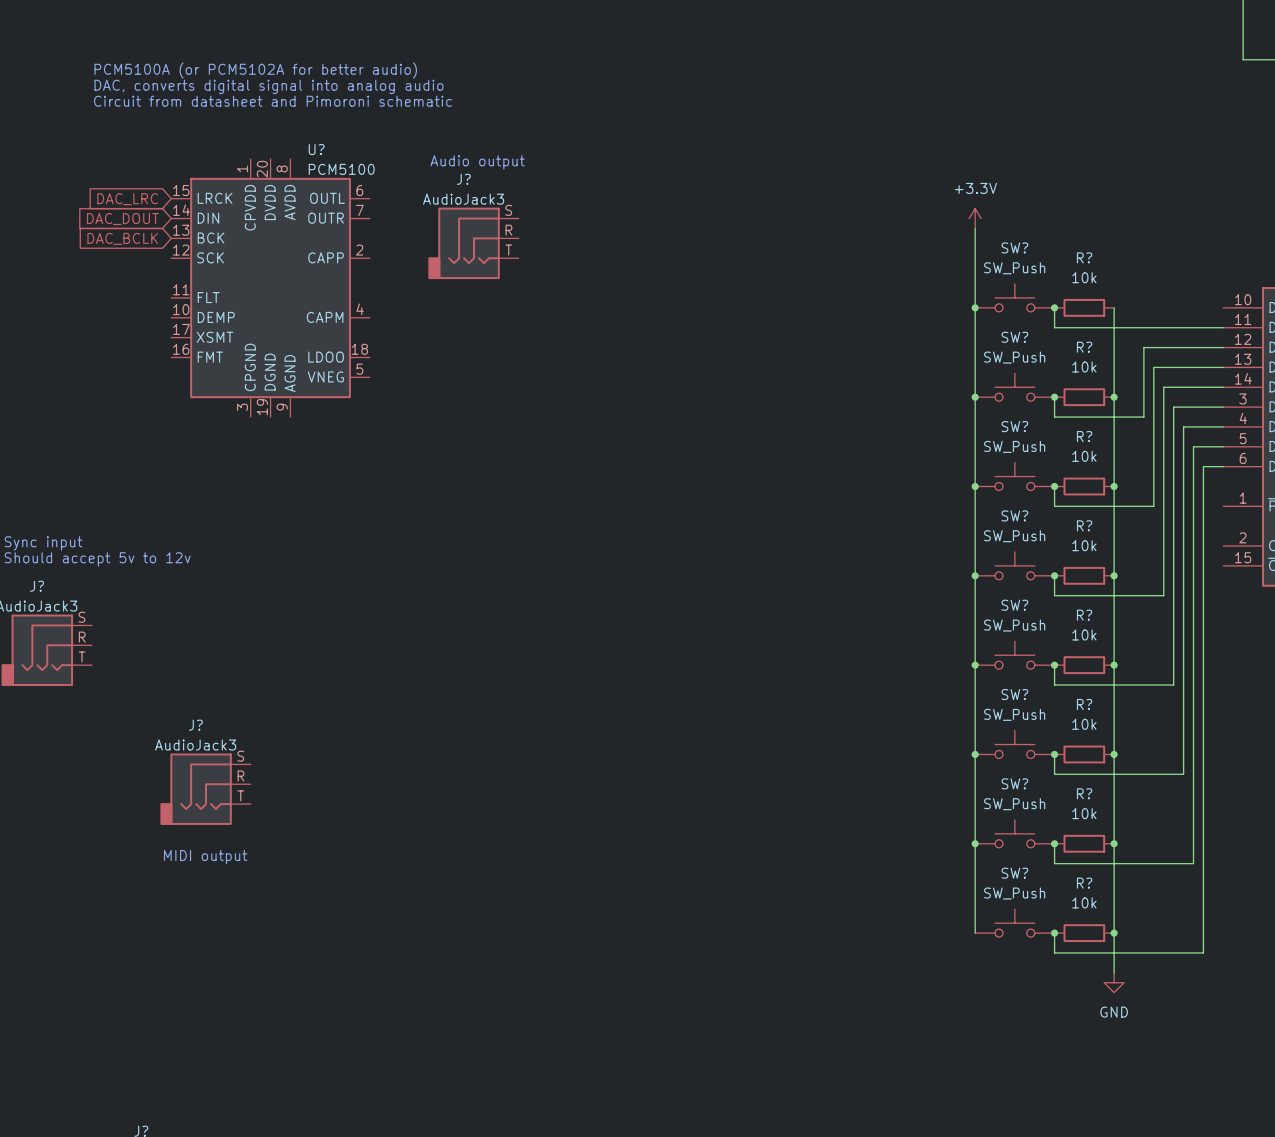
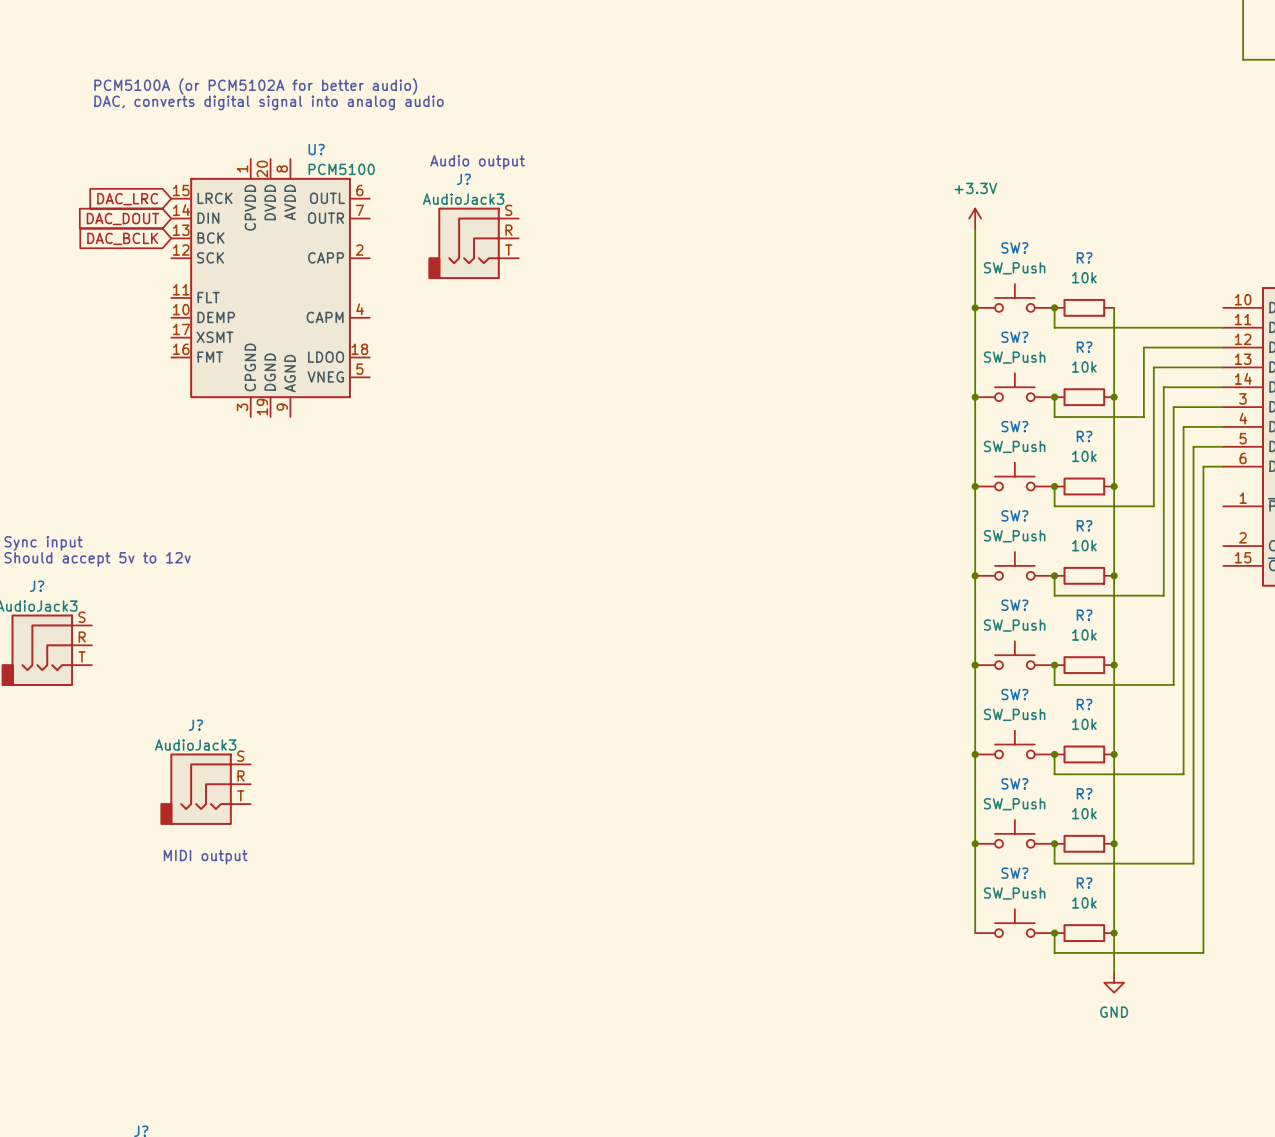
text: PCM5100A (or PCM5102A for better audio) (255, 70) -> none
text: DAC, converts digital signal into analog audio (268, 86) -> PCM5100A (or PCM5102A for better audio) (255, 86)
text: Circuit from datasheet and Pimoroni schematic (272, 101) -> DAC, converts digital signal into analog audio (268, 102)

